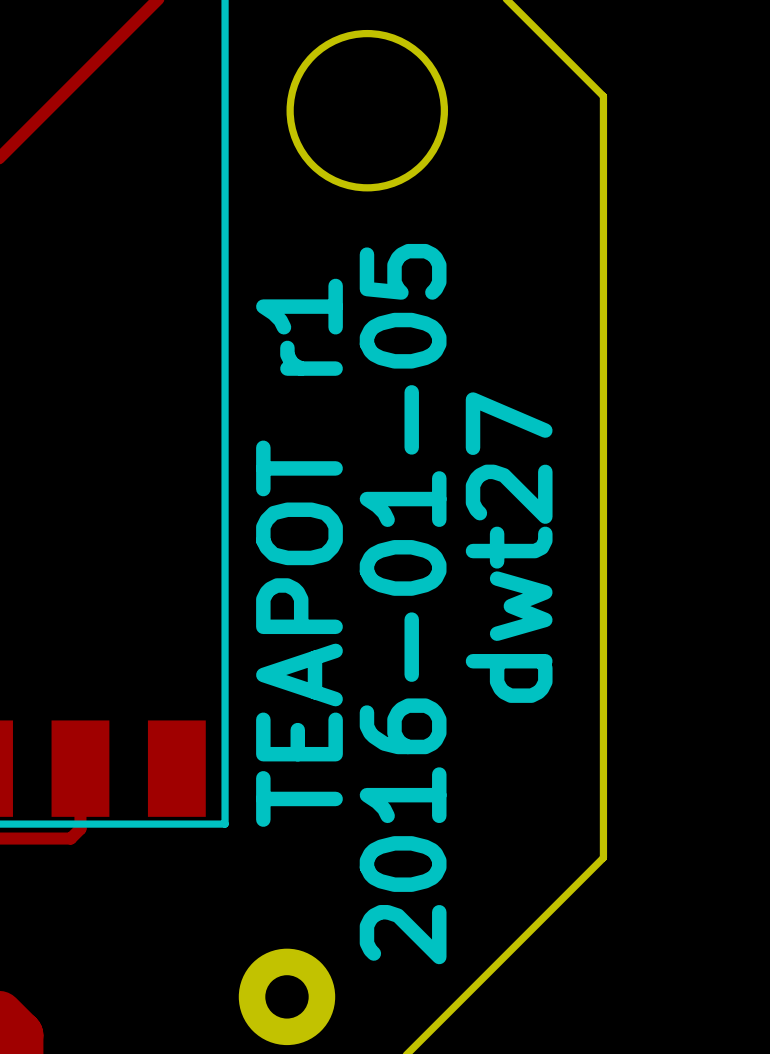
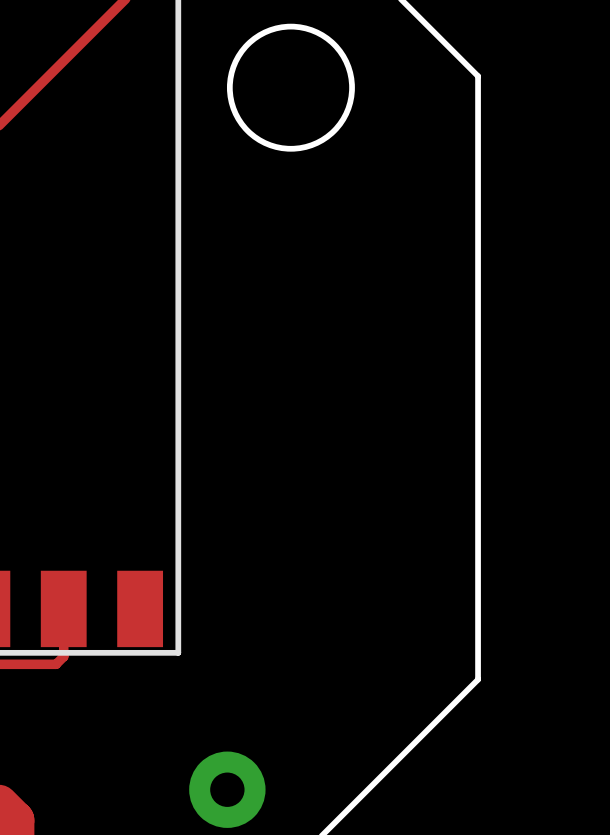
text: dwt27 (509, 547) -> none
text: TEAPOT r1 (299, 552) -> none
text: 2016-01-05 (403, 604) -> none

